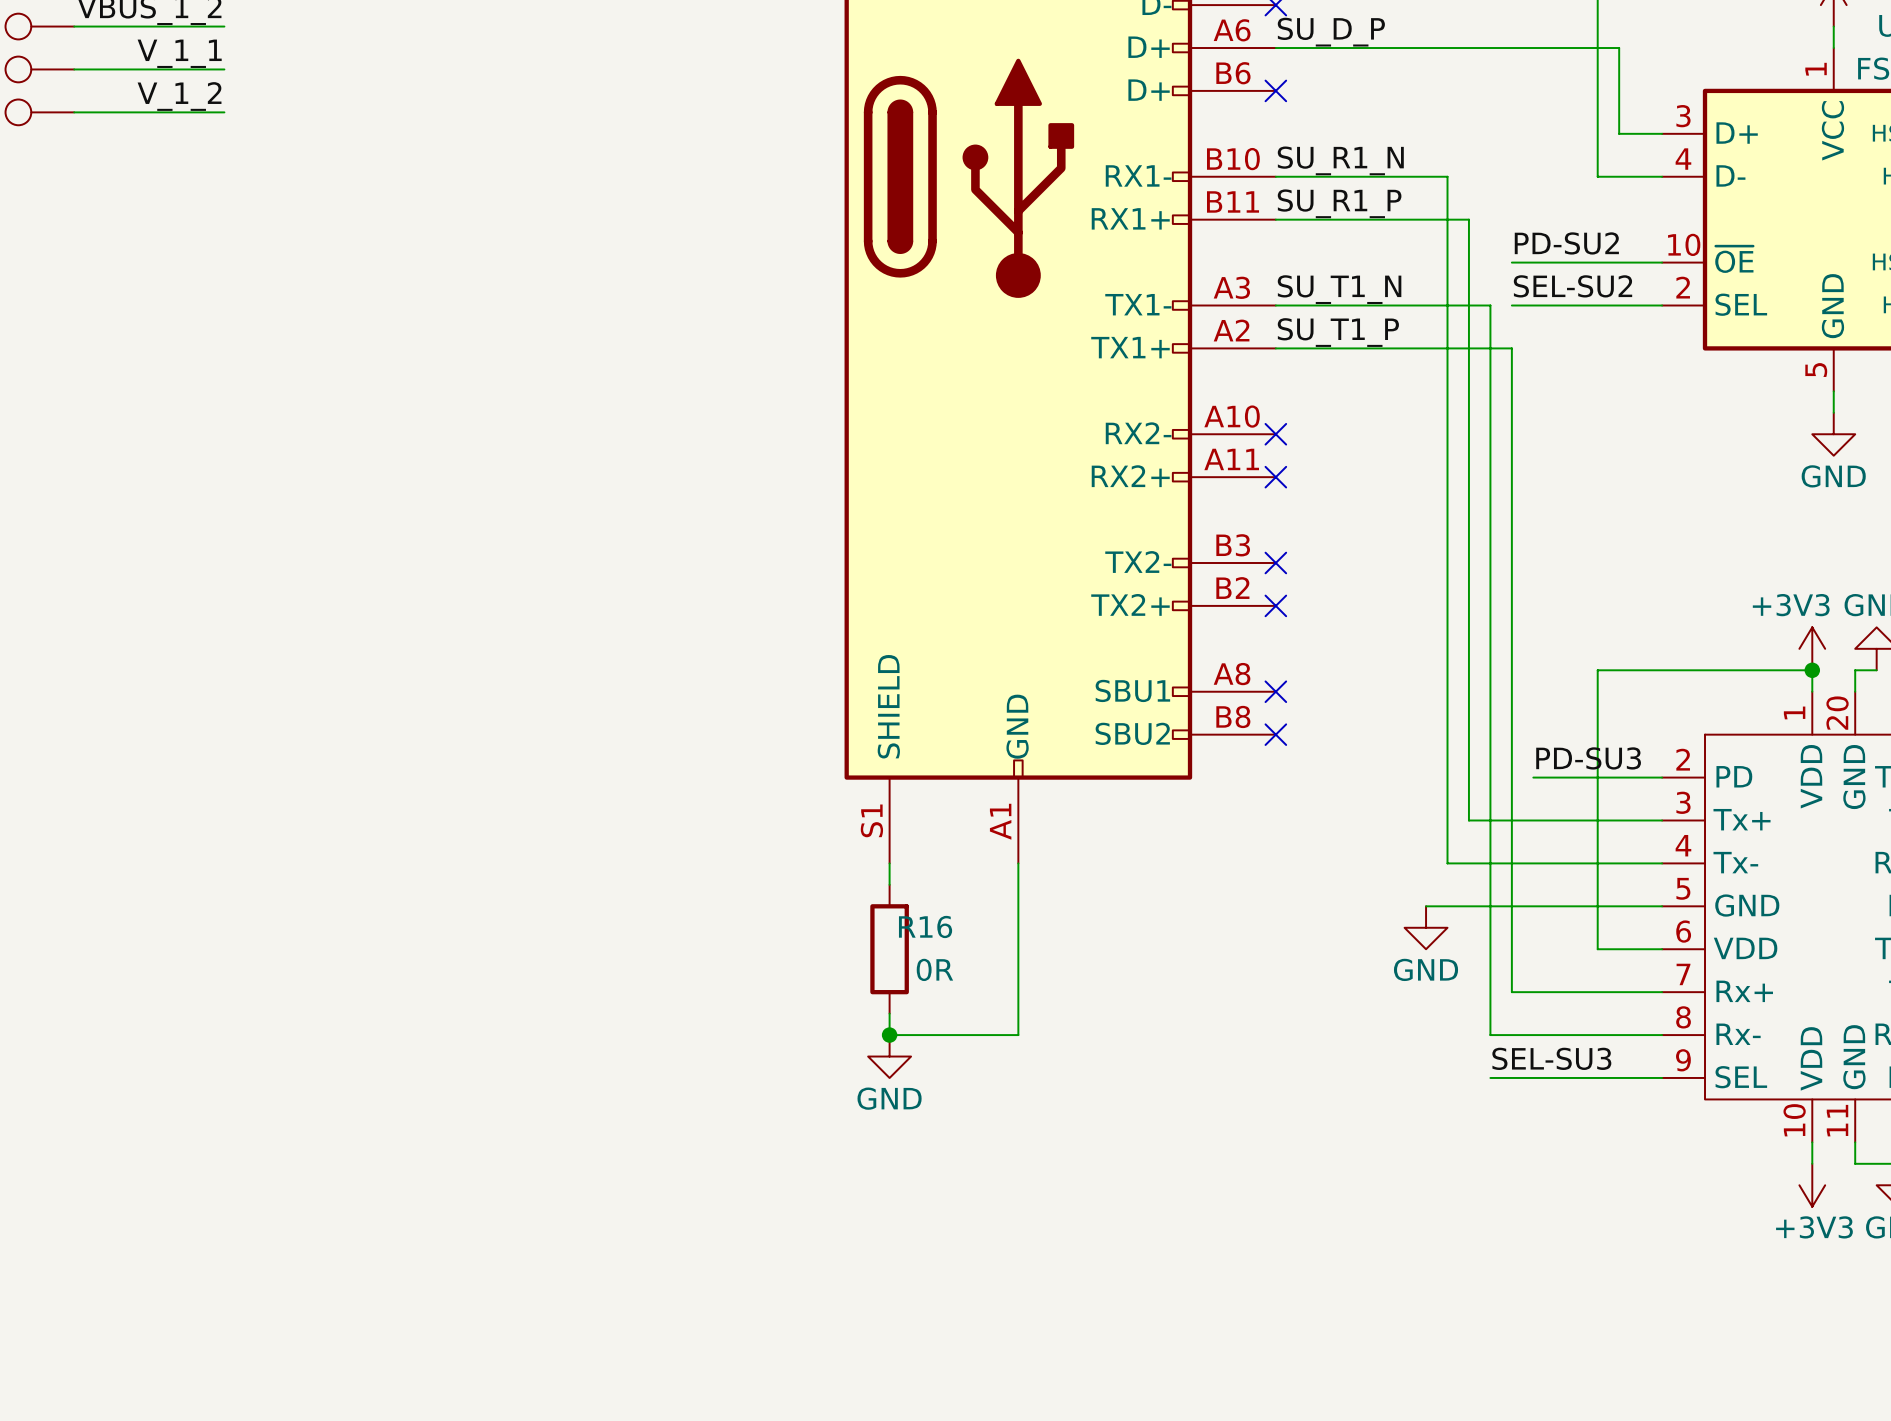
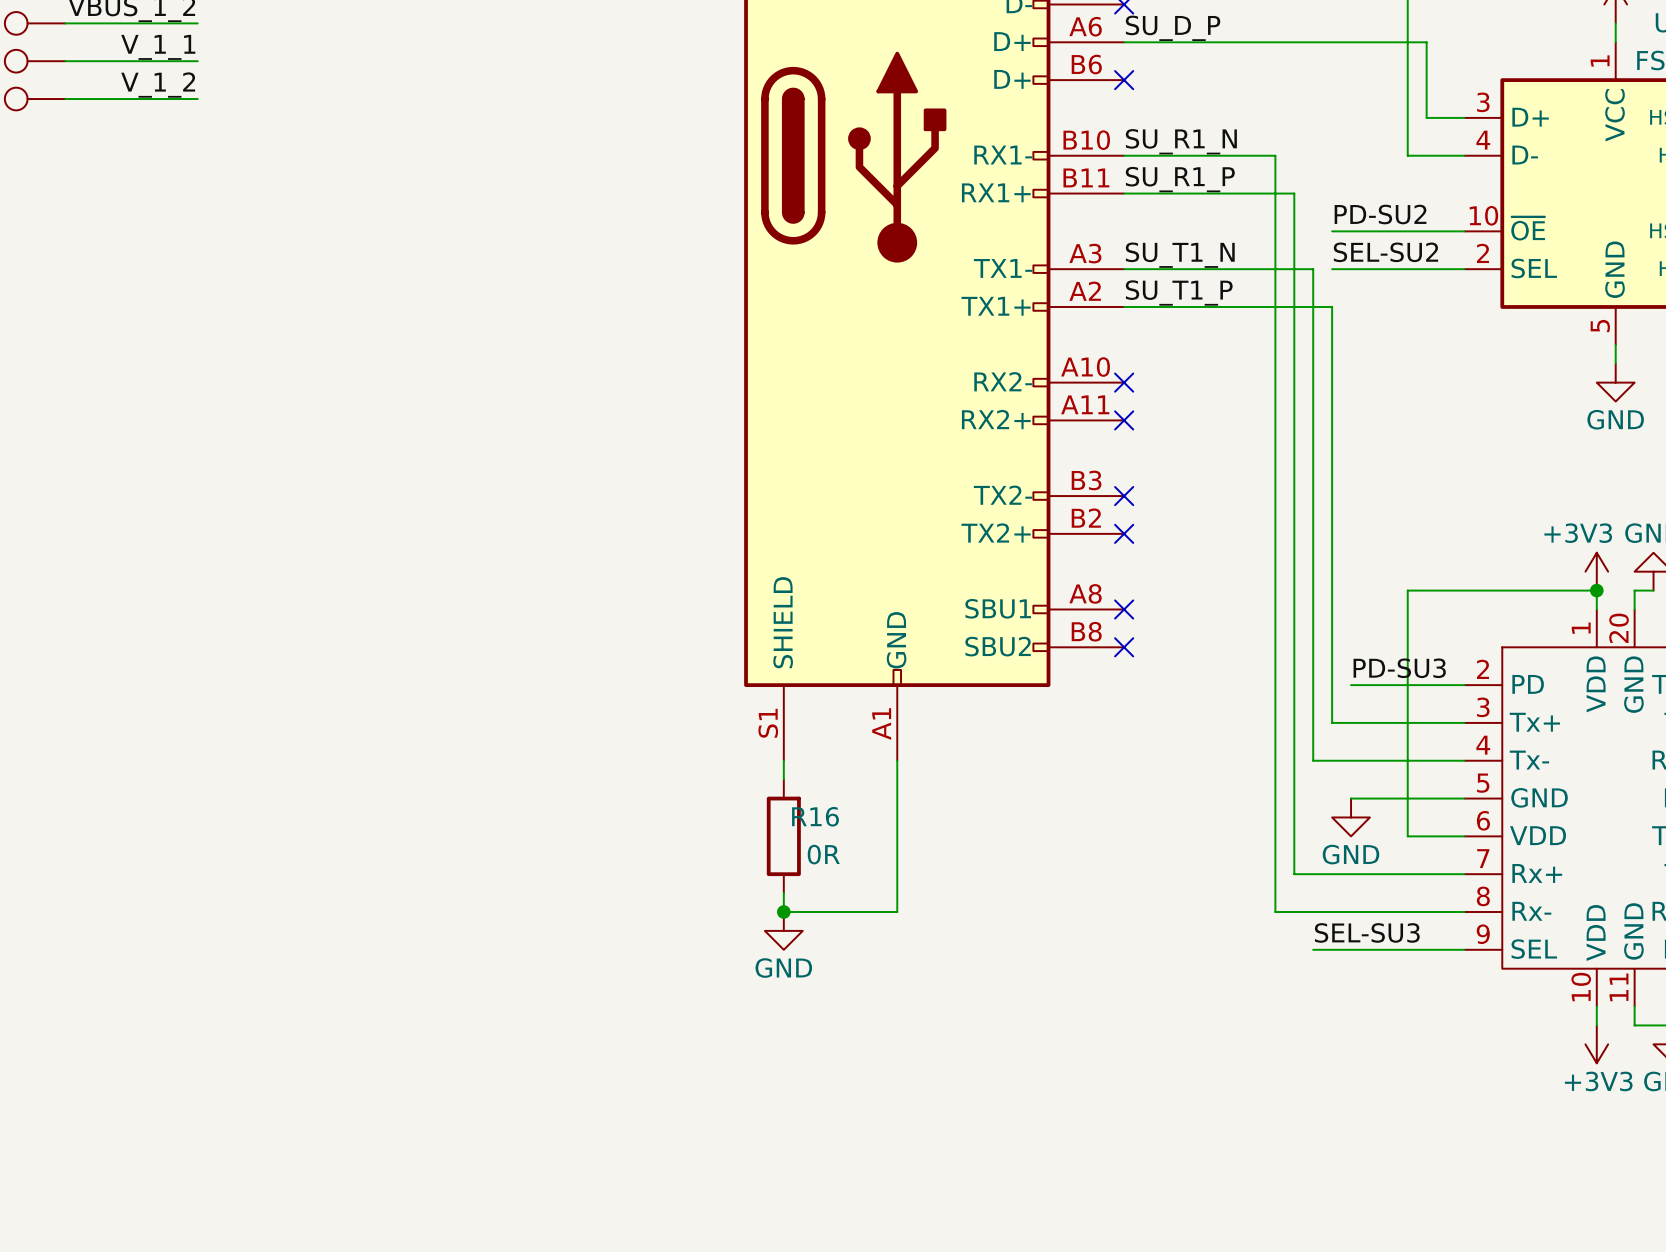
wire: (1468, 820) (1511, 820) (1511, 992) -> (1294, 722) (1294, 874) (1332, 874)
wire: (1447, 863) (1490, 863) (1490, 1035) -> (1275, 760) (1275, 911) (1313, 911)
wire: (1426, 906) (1533, 906) -> none
power symbol position: GND (1426, 927) -> GND (1351, 817)

